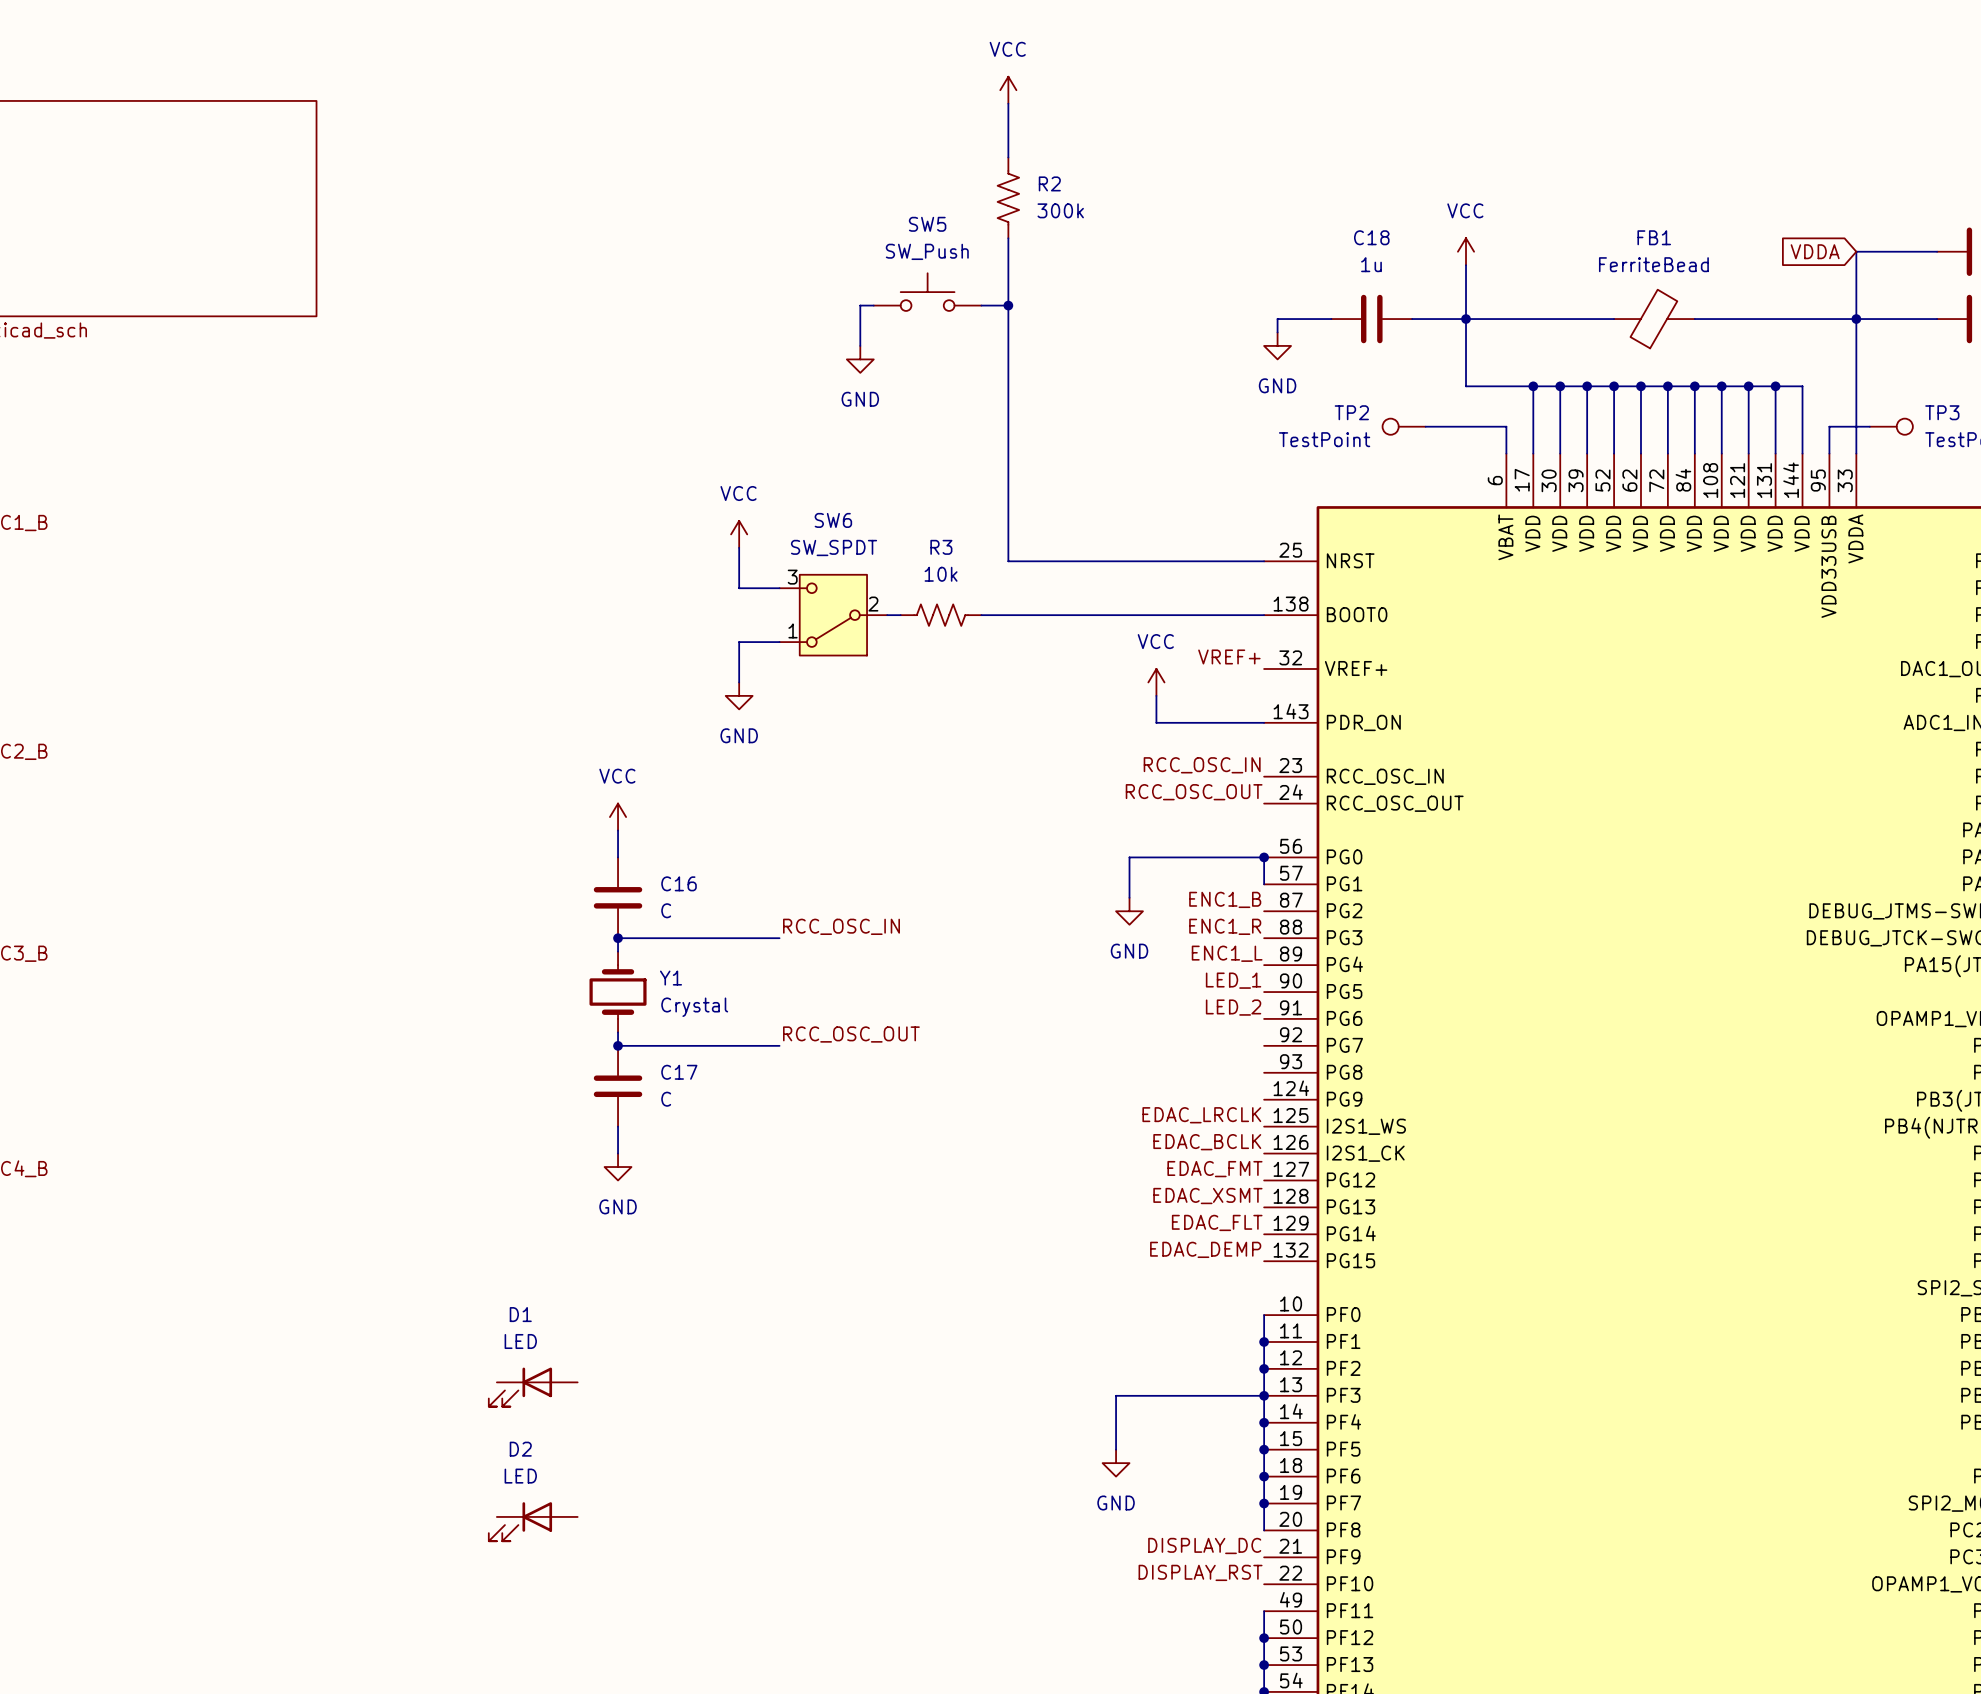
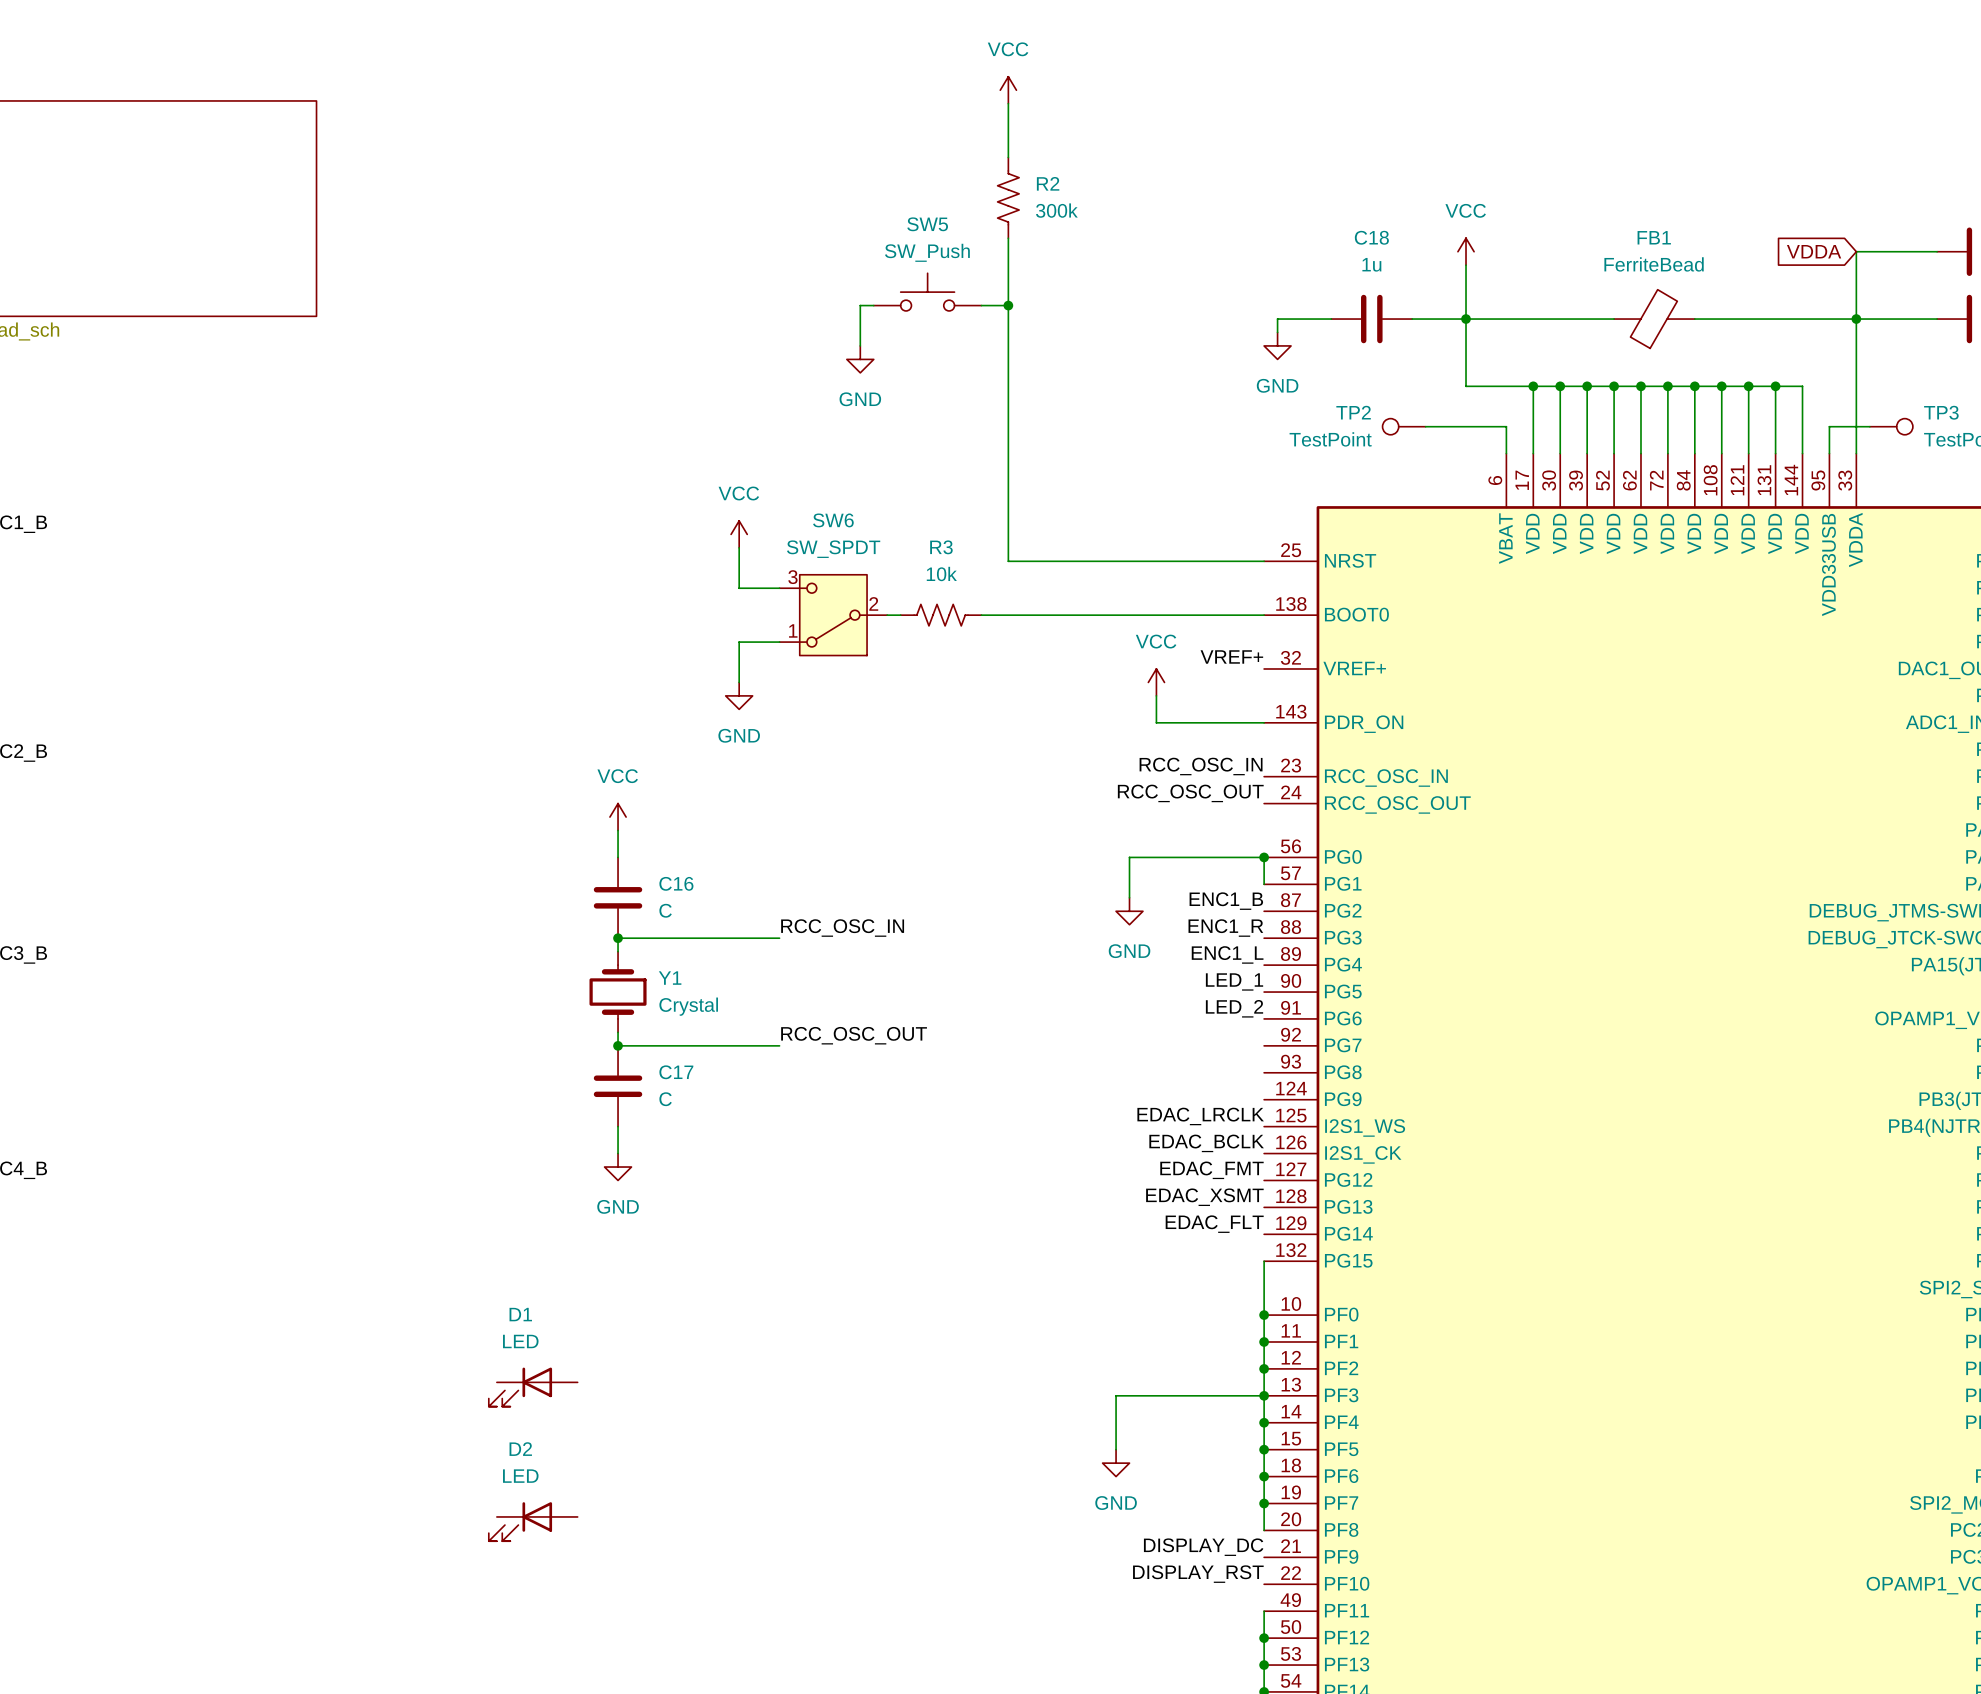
label: EDAC_DEMP (1205, 1249) -> none
wire: none -> (1264, 1261) (1264, 1315)
junction: none -> (1264, 1315)

